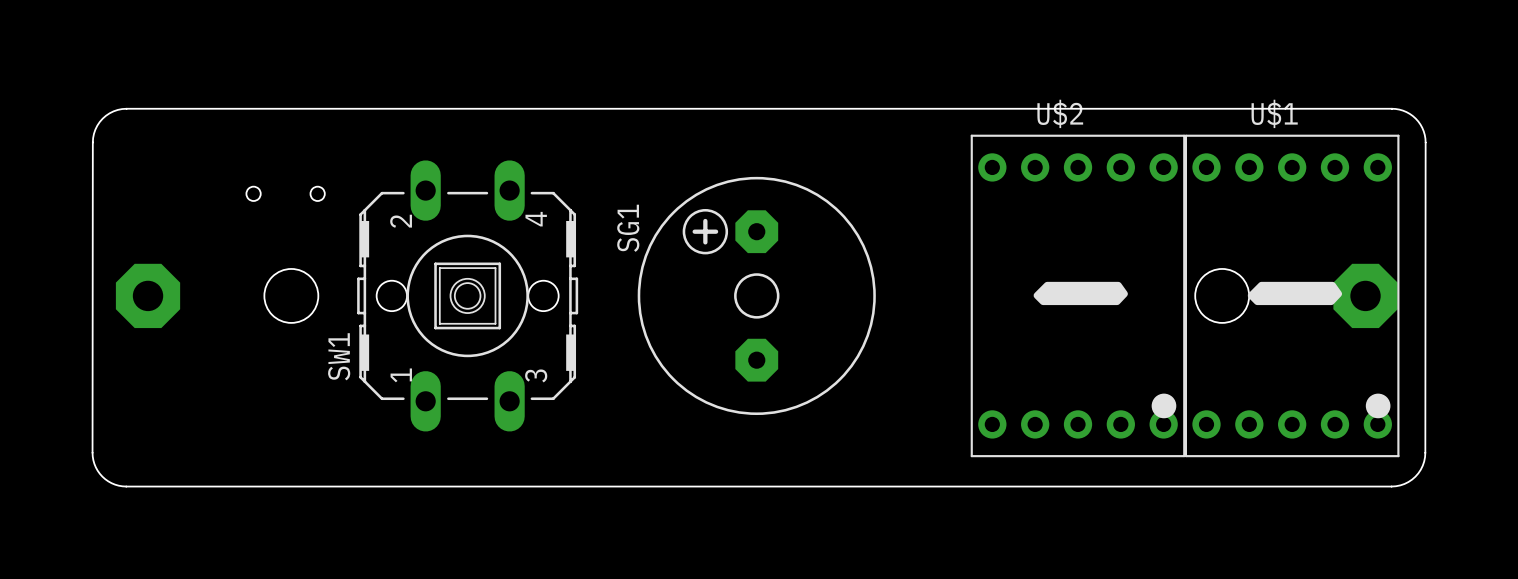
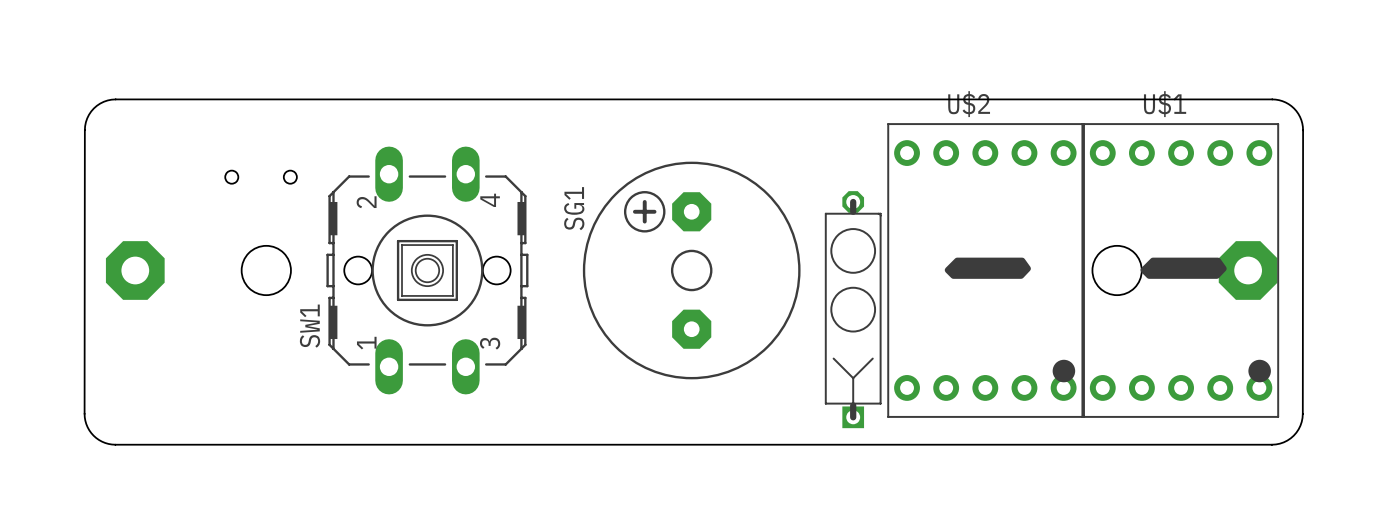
part: none -> (853, 309)

